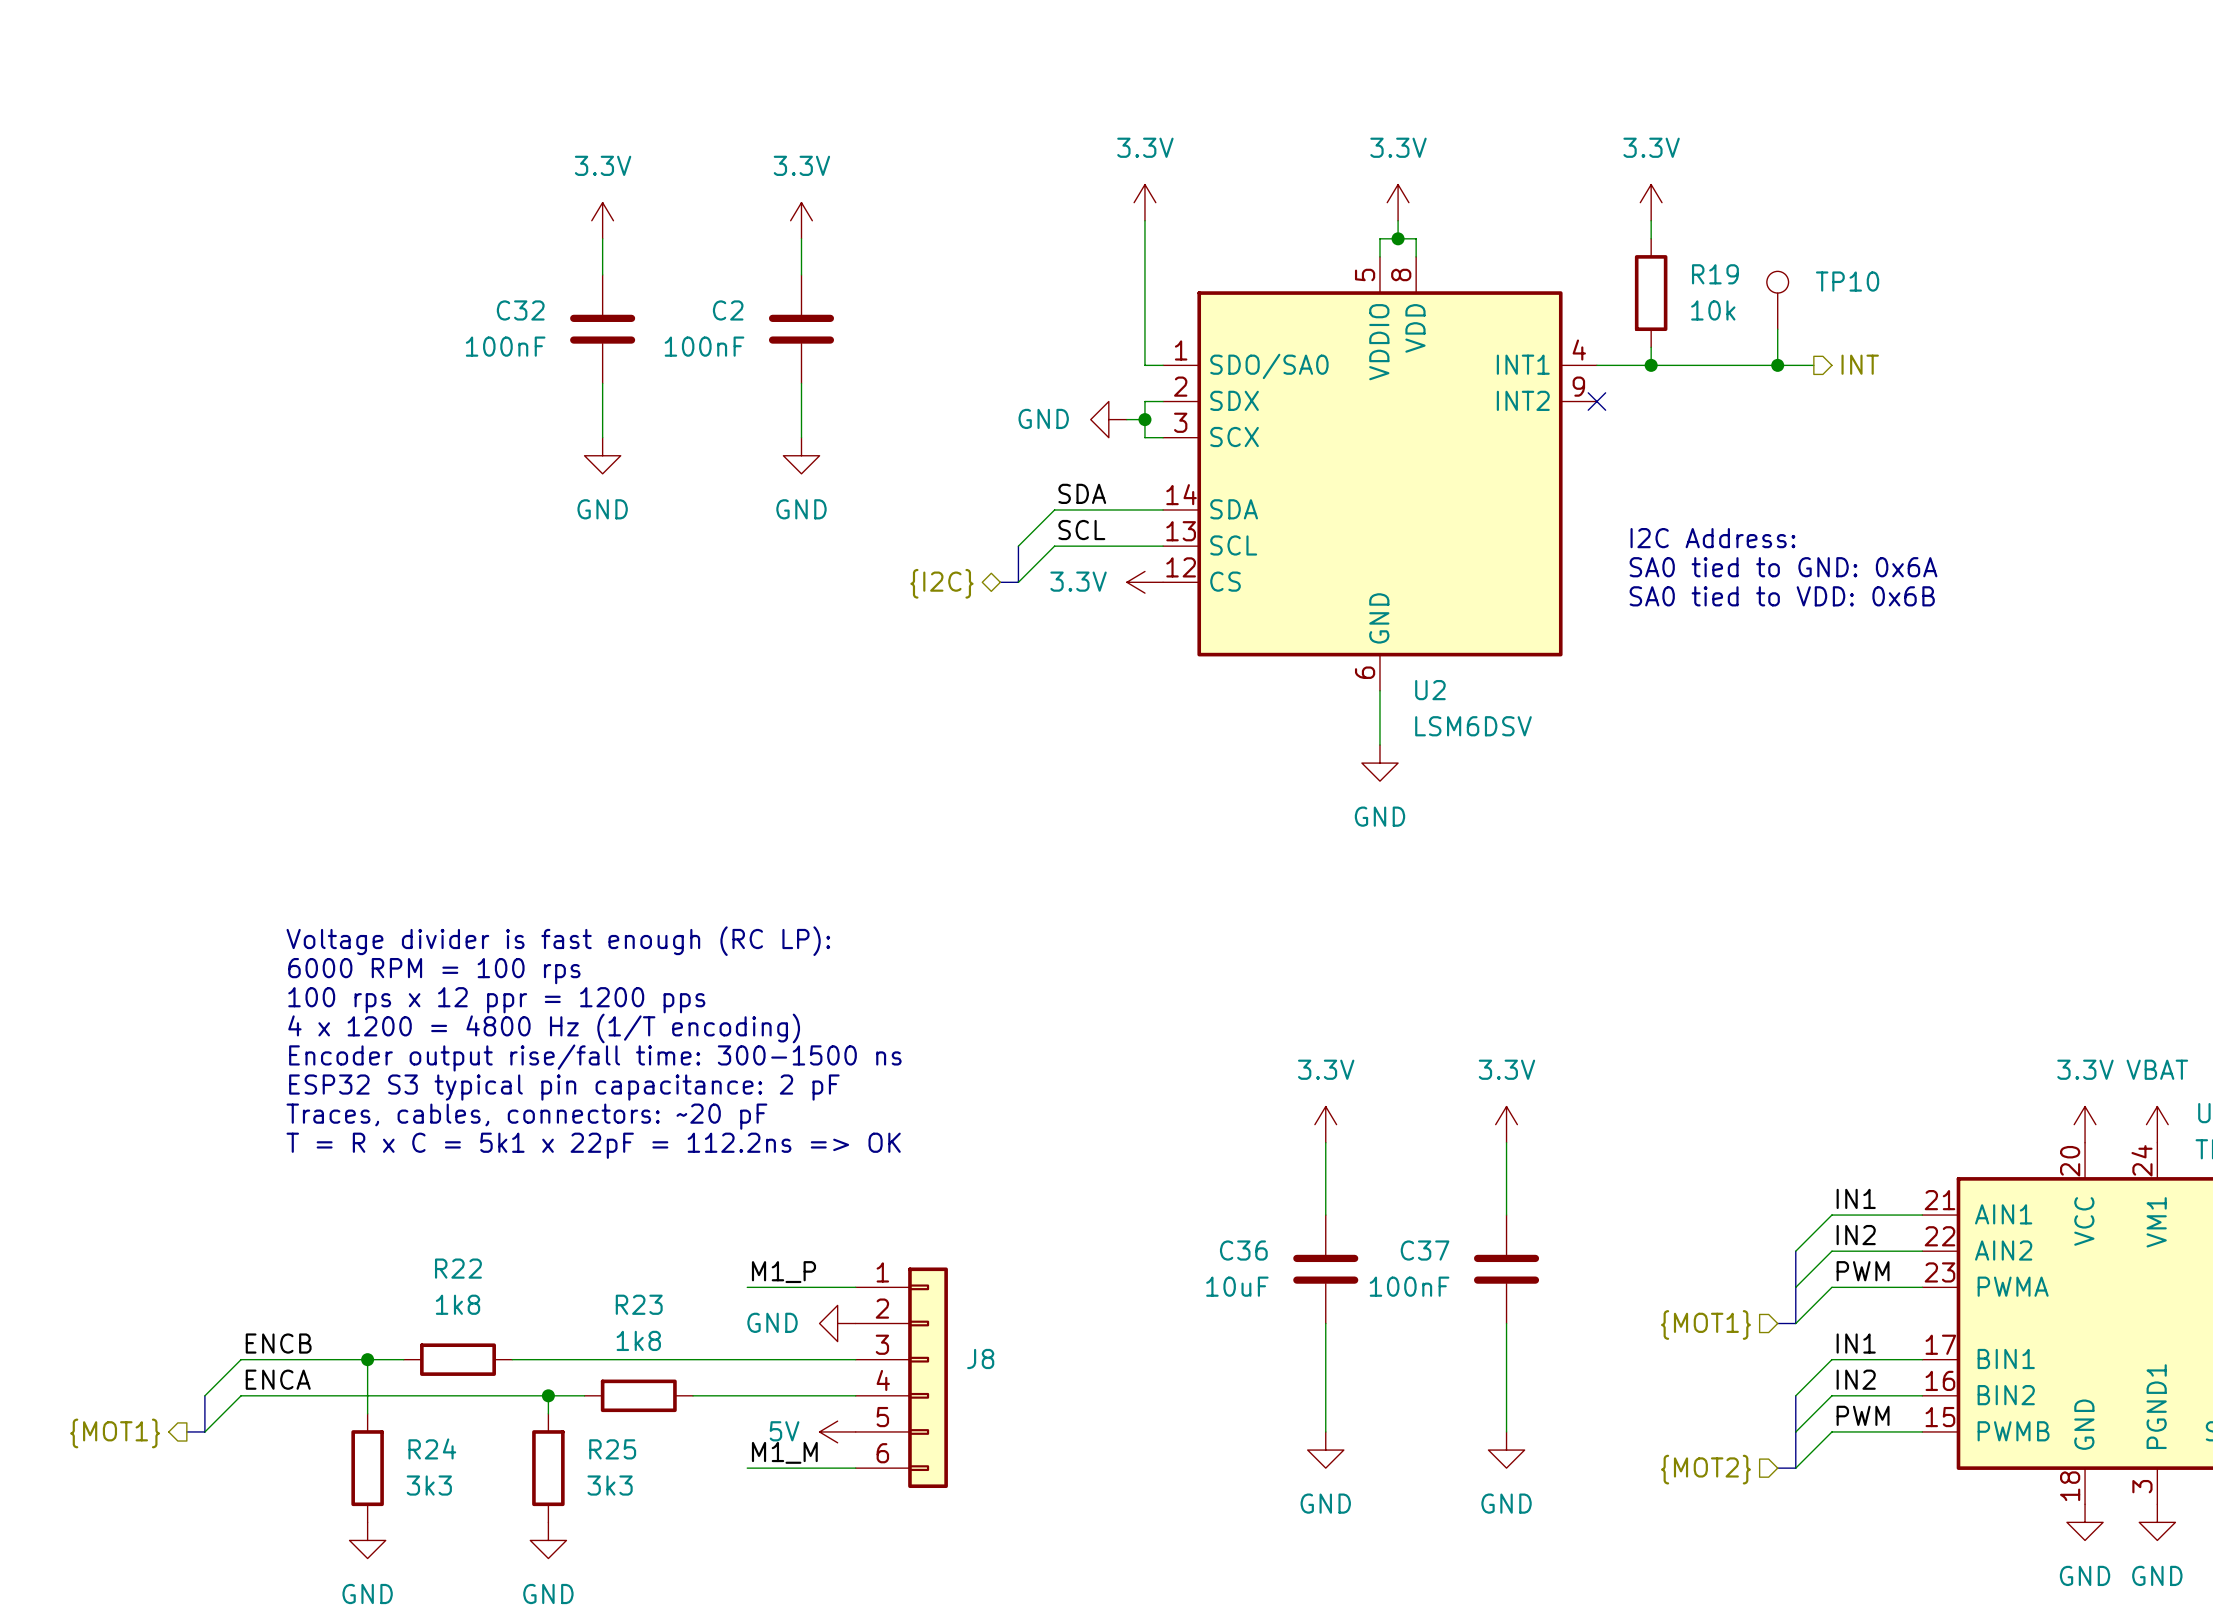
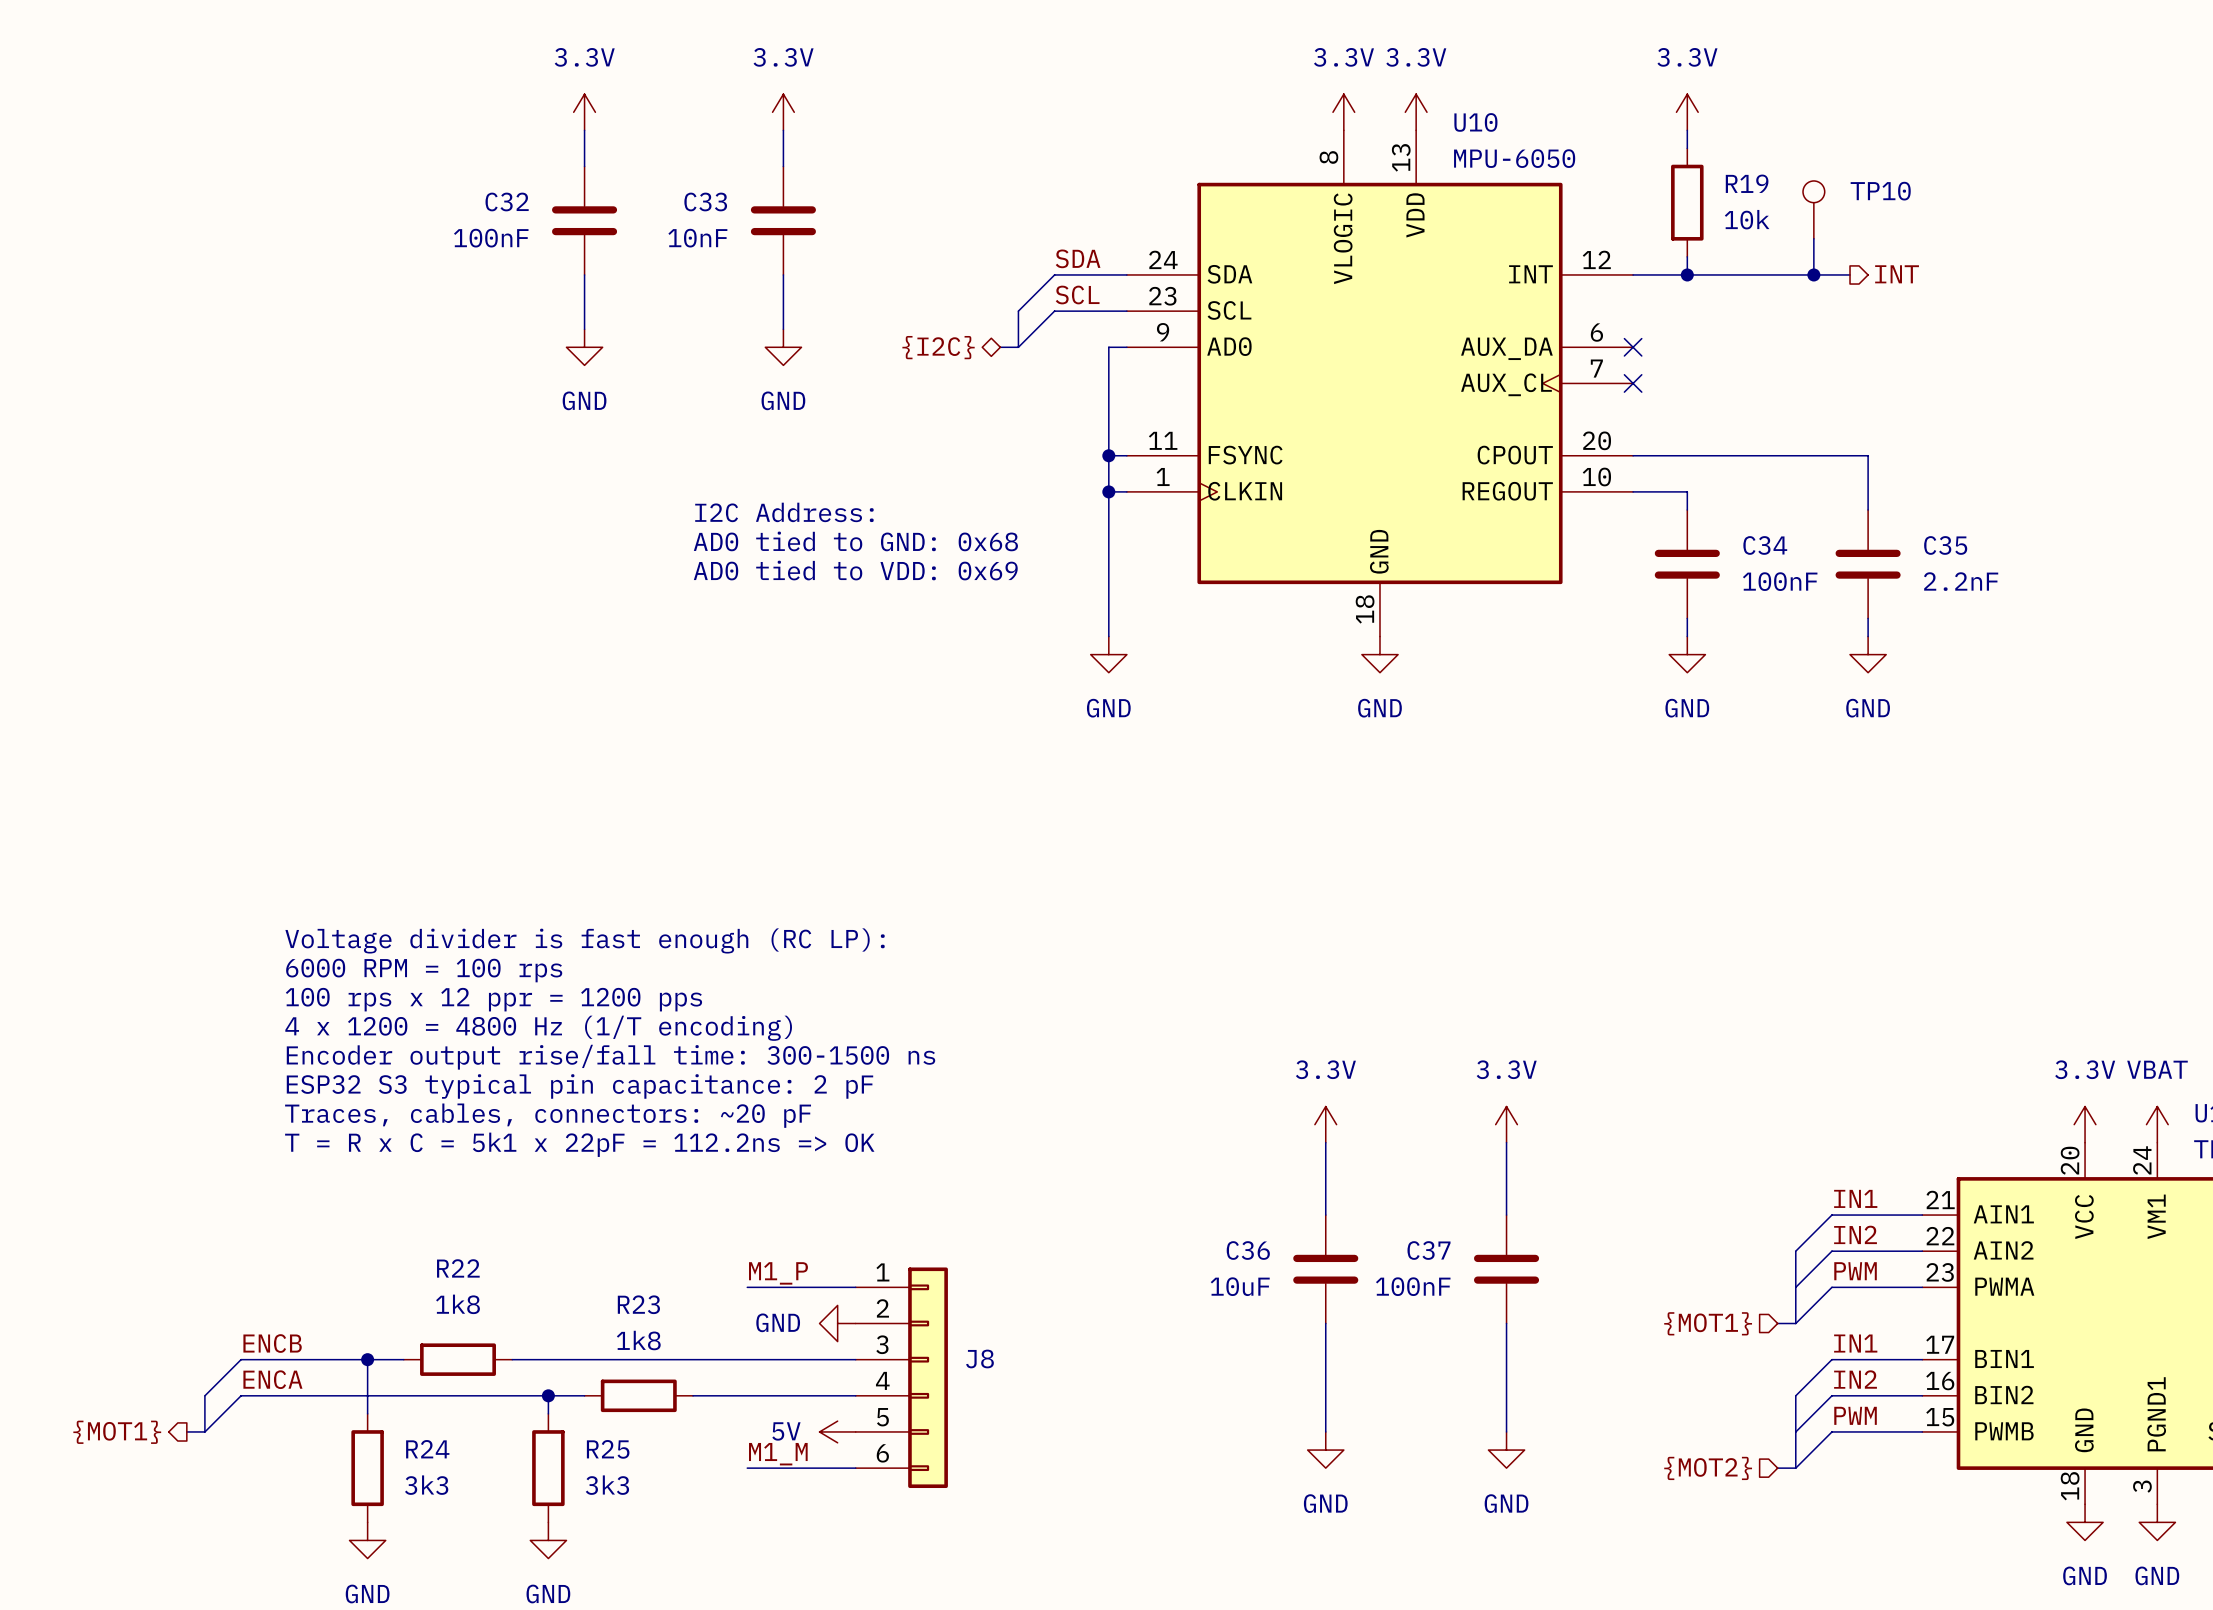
power symbol: none -> 3.3V (584, 112)
power symbol: none -> 3.3V (783, 112)
power symbol: none -> 3.3V (1343, 112)
power symbol: none -> 3.3V (1416, 112)
power symbol: 3.3V (1144, 202) -> none
power symbol: 3.3V (1398, 202) -> none
power symbol position: 3.3V (1651, 202) -> 3.3V (1687, 112)
power symbol: 3.3V (602, 220) -> none
C33: none -> 10nF (783, 220)
power symbol: 3.3V (801, 220) -> none
wire: (1144, 220) (1144, 365) (1163, 365) -> none
wire: (1651, 220) (1651, 238) -> (1687, 130) (1687, 148)
wire: (602, 238) (602, 274) -> (584, 130) (584, 166)
wire: (801, 238) (801, 274) -> (783, 130) (783, 166)
junction: (1398, 238) -> none
wire: none -> (1126, 274) (1054, 274) (1018, 311)
junction: none -> (1687, 274)
junction: none -> (1813, 274)
R19 position: (1651, 293) -> (1687, 202)
TP10 position: (1777, 300) -> (1813, 209)
wire: none -> (1126, 311) (1054, 311) (1018, 347)
C32 position: (602, 329) -> (584, 220)
C2: 100nF (801, 329) -> none
wire: (1777, 329) (1777, 365) -> (1813, 238) (1813, 274)
power symbol: none -> GND (584, 347)
power symbol: none -> GND (783, 347)
wire: none -> (1126, 347) (1108, 347) (1108, 636)
no-connect mark: none -> (1633, 347)
wire: (1651, 347) (1651, 365) -> (1687, 256) (1687, 274)
hierarchical label position: INT (1860, 364) -> INT (1897, 274)
wire: (1596, 365) (1813, 365) -> (1633, 274) (1850, 274)
junction: (1651, 365) -> none
junction: (1777, 365) -> none
wire: (602, 383) (602, 437) -> (584, 274) (584, 329)
wire: (801, 383) (801, 437) -> (783, 274) (783, 329)
U10: none -> MPU-6050 (1379, 383)
no-connect mark: none -> (1633, 383)
wire: (1163, 401) (1144, 401) (1144, 437) (1163, 437) -> none
no-connect mark: (1596, 401) -> none
power symbol: GND (1108, 419) -> none
wire: (1126, 419) (1144, 419) -> (1108, 455) (1126, 455)
junction: (1144, 419) -> none
power symbol: GND (602, 455) -> none
power symbol: GND (801, 455) -> none
junction: none -> (1108, 455)
wire: none -> (1633, 455) (1868, 455) (1868, 509)
U2: LSM6DSV (1379, 473) -> none
wire: none -> (1108, 491) (1126, 491)
junction: none -> (1108, 491)
wire: none -> (1633, 491) (1687, 491) (1687, 509)
label position: SDA (1082, 493) -> SDA (1078, 258)
wire: (1163, 509) (1054, 509) (1018, 546) -> none
text: none -> I2C Address: (784, 512)
label position: SCL (1081, 530) -> SCL (1077, 295)
text: I2C Address: (1712, 538) -> none
text: none -> AD0 tied to GND: 0x68 (855, 541)
bus: (1018, 546) (1018, 582) (1000, 582) -> (1018, 311) (1018, 347) (1000, 347)
wire: (1163, 546) (1054, 546) (1018, 582) -> none
C34: none -> 100nF (1687, 564)
C35: none -> 2.2nF (1868, 564)
text: SA0 tied to GND: 0x6A (1783, 567) -> none
text: none -> AD0 tied to VDD: 0x69 (855, 570)
power symbol: 3.3V (1144, 582) -> none
hierarchical label position: {I2C} (941, 583) -> {I2C} (938, 347)
text: SA0 tied to VDD: 0x6B (1782, 596) -> none
wire: none -> (1687, 618) (1687, 636)
wire: none -> (1868, 618) (1868, 636)
power symbol: none -> GND (1108, 654)
power symbol: none -> GND (1687, 654)
power symbol: none -> GND (1868, 654)
wire: (1379, 690) (1379, 745) -> none
power symbol position: GND (1379, 763) -> GND (1379, 654)

